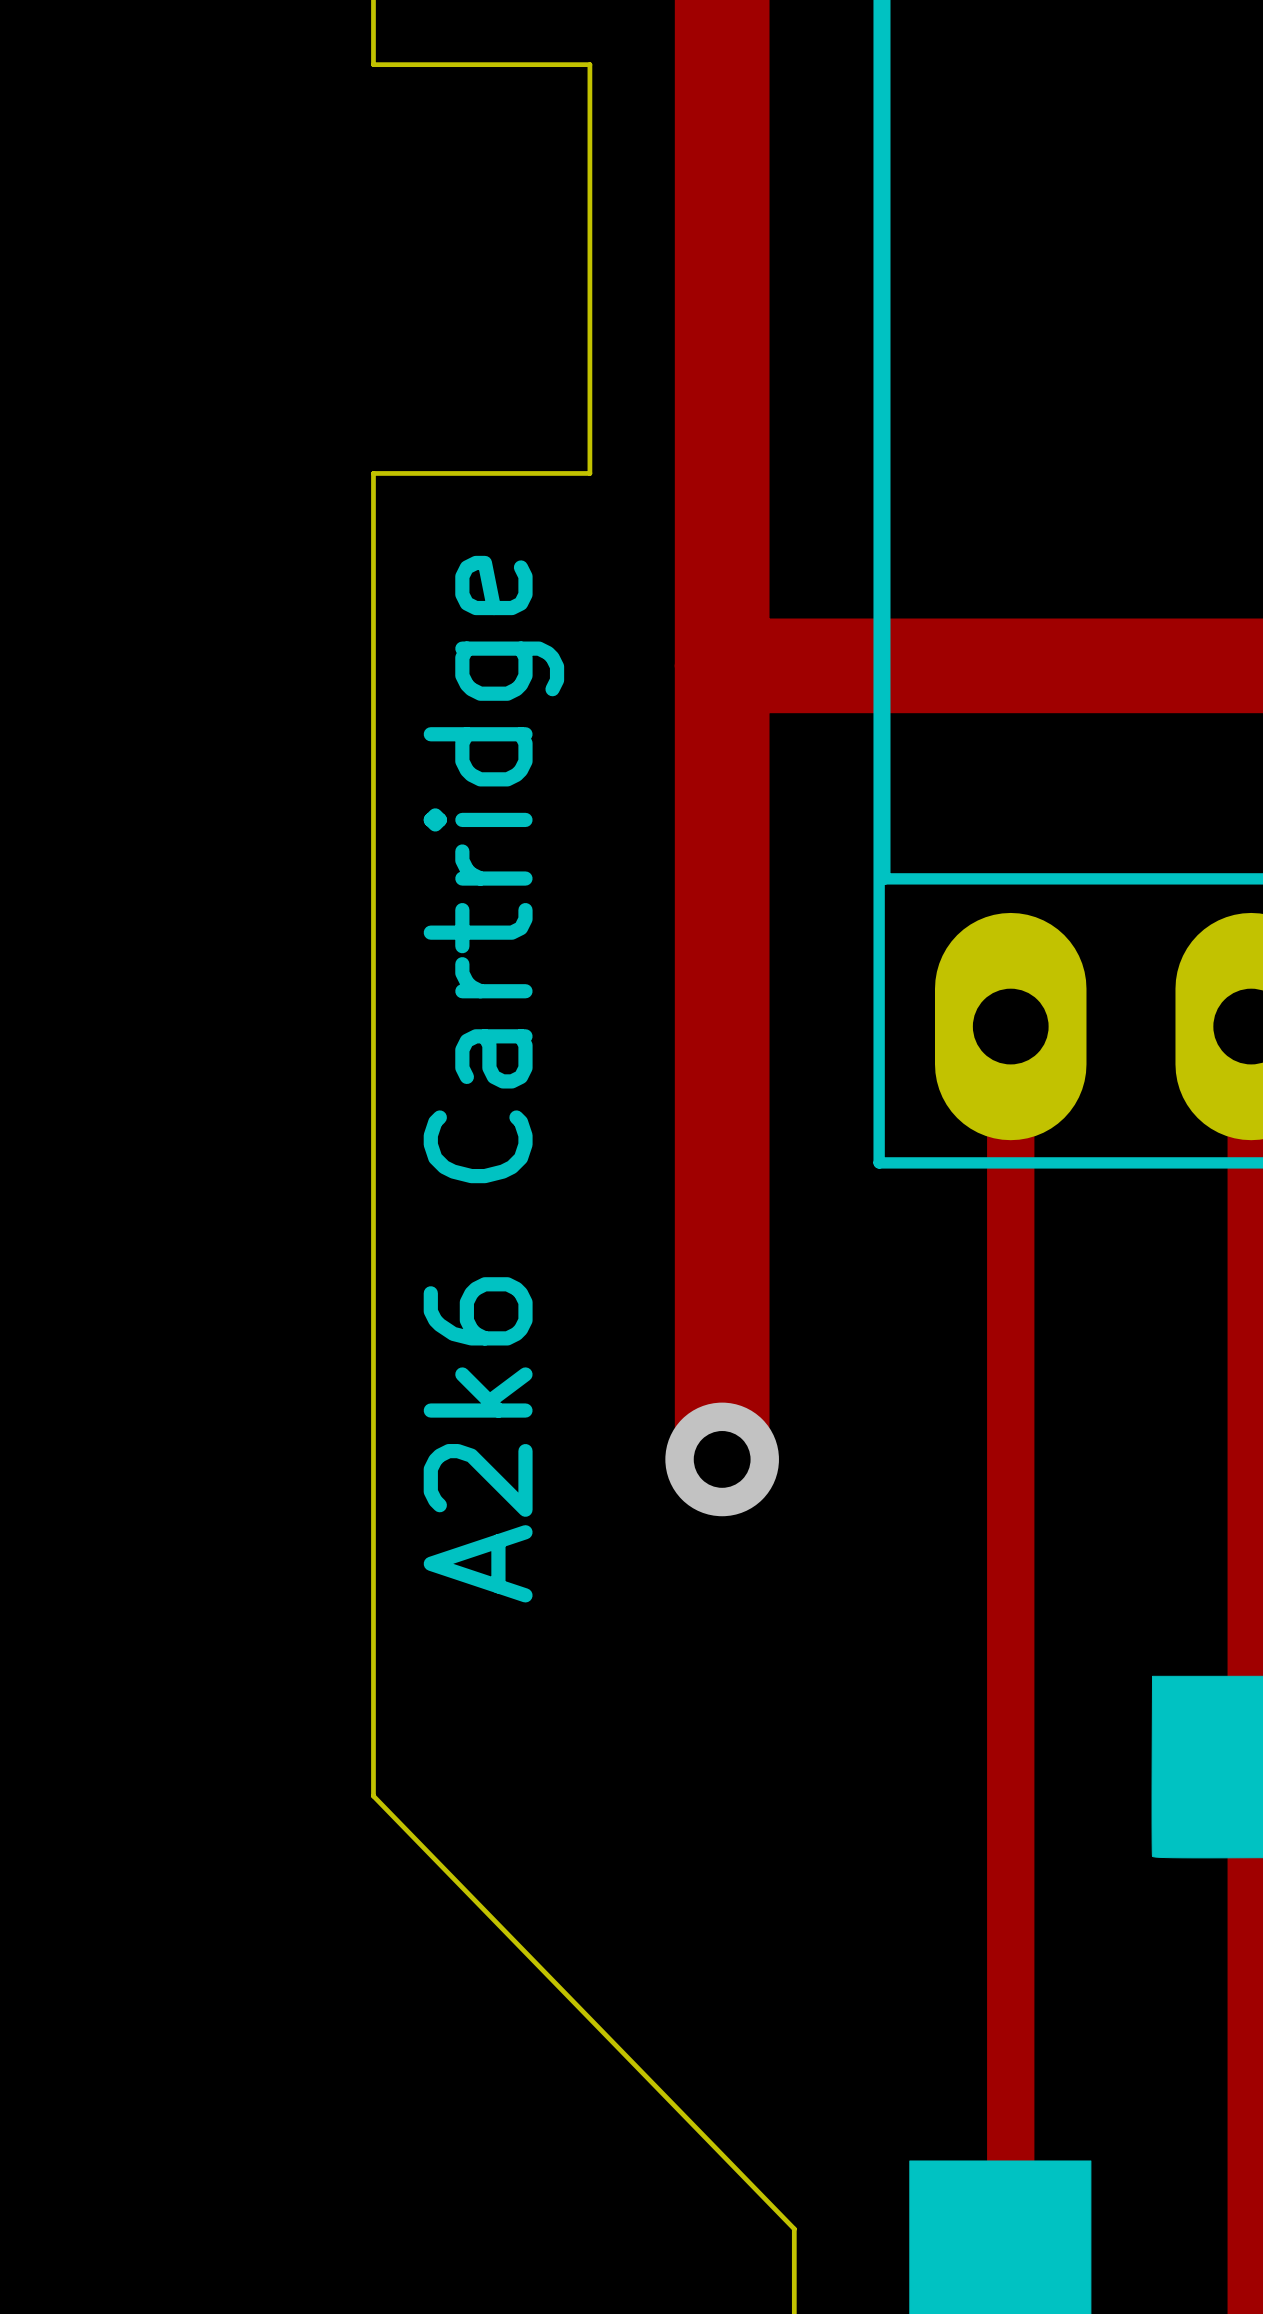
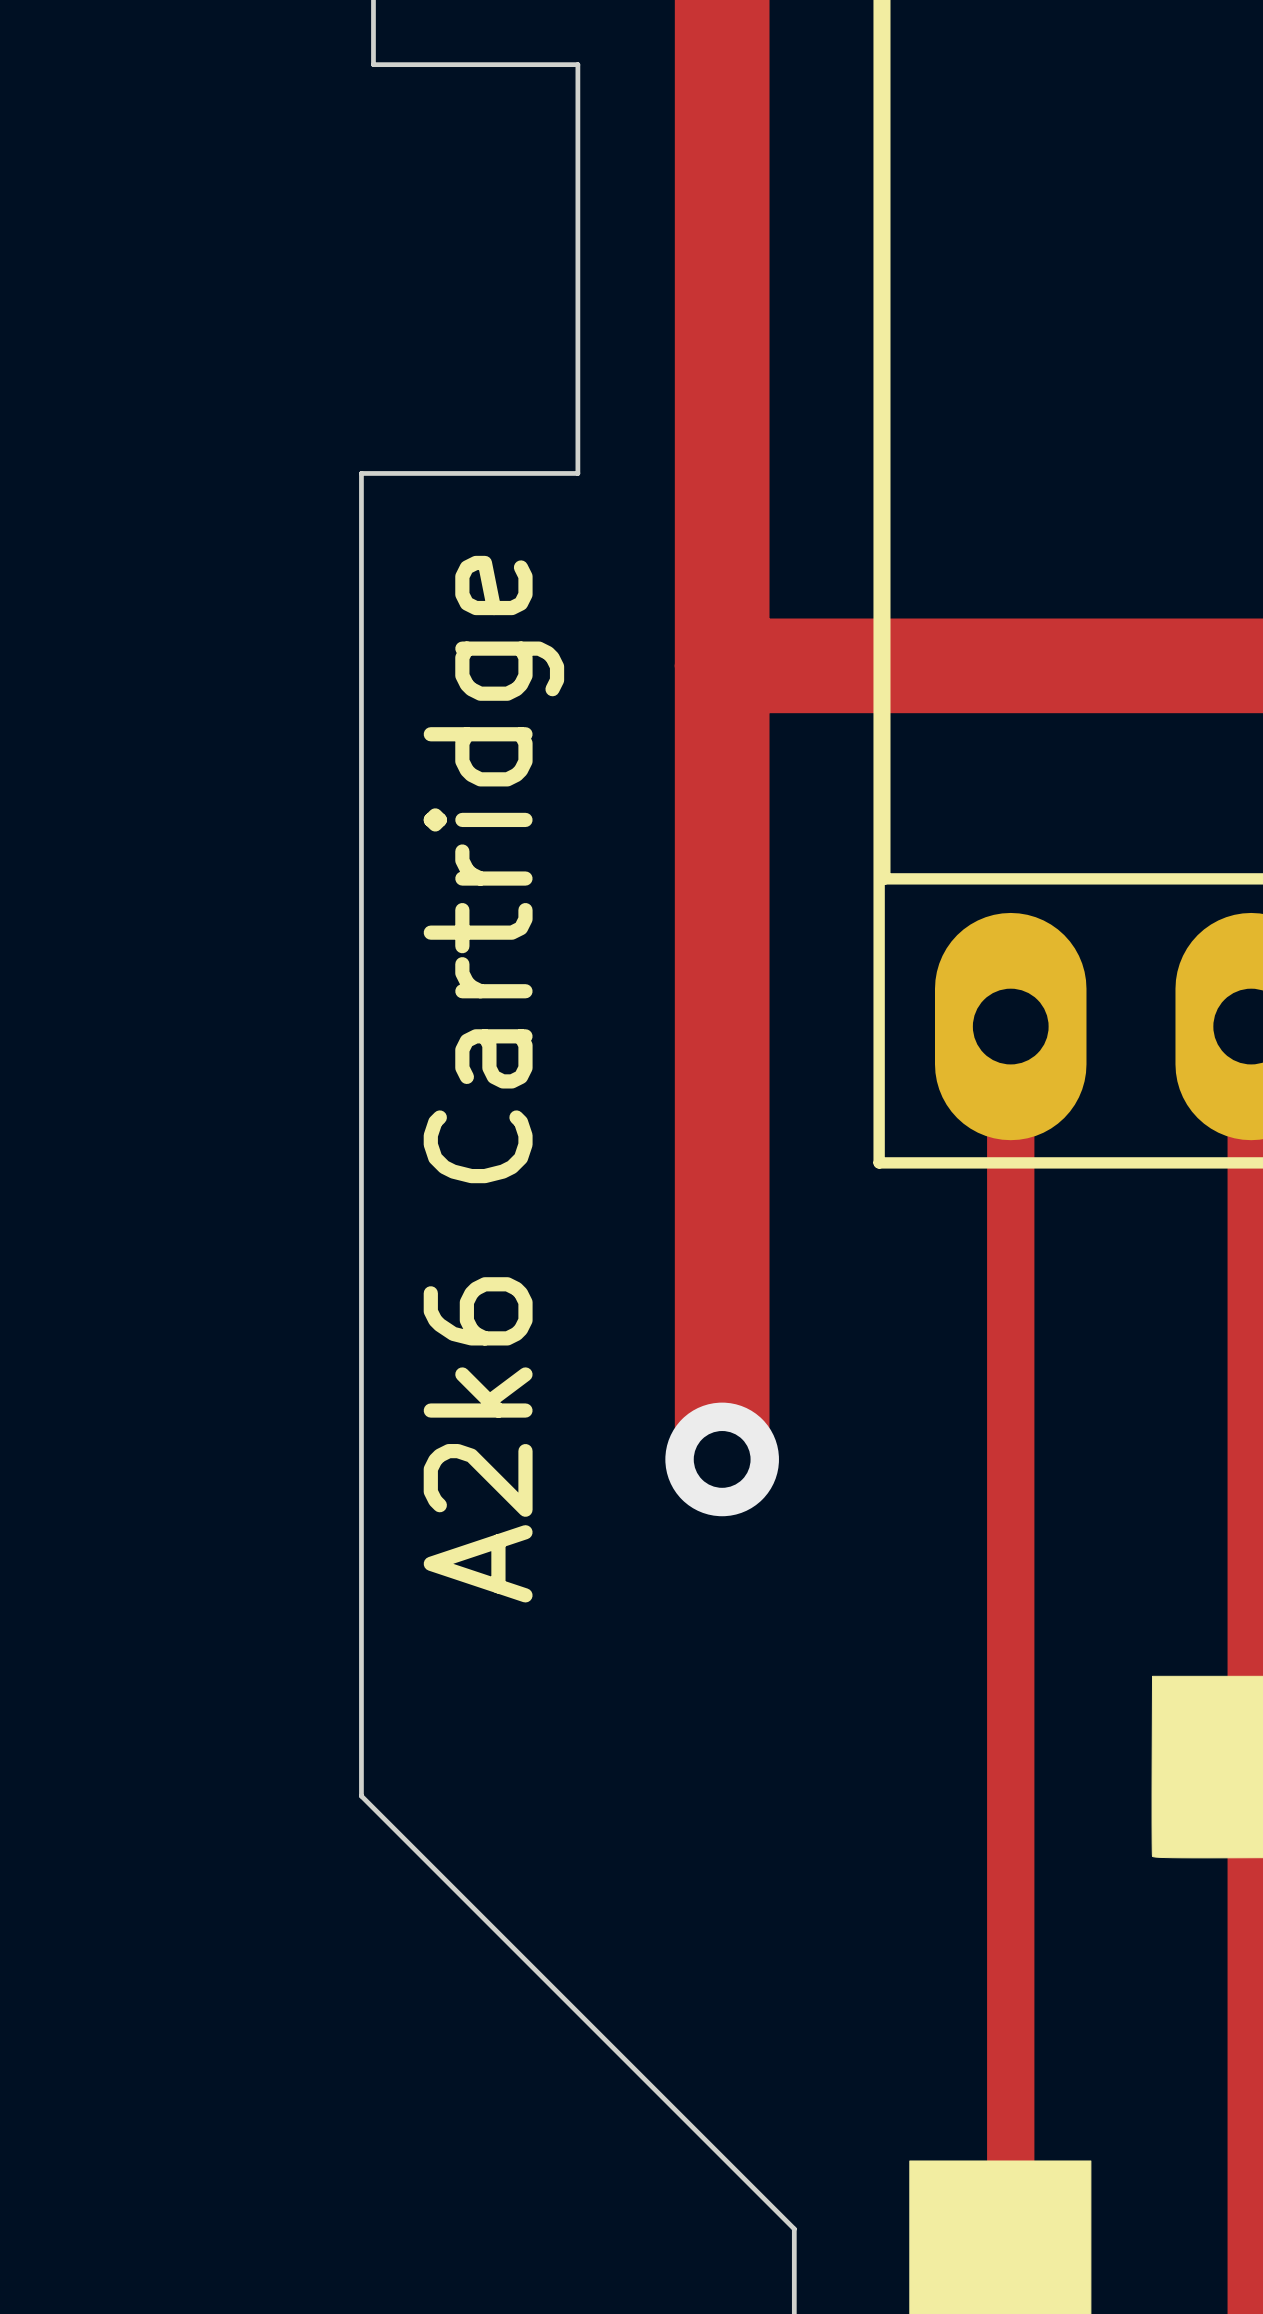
board edge: (577, 64) (589, 64) (589, 473) (577, 473) -> (577, 64) (577, 473)
board edge: (373, 473) (373, 1796) (794, 2228) -> (373, 473) (361, 473) (361, 1796) (794, 2228)

